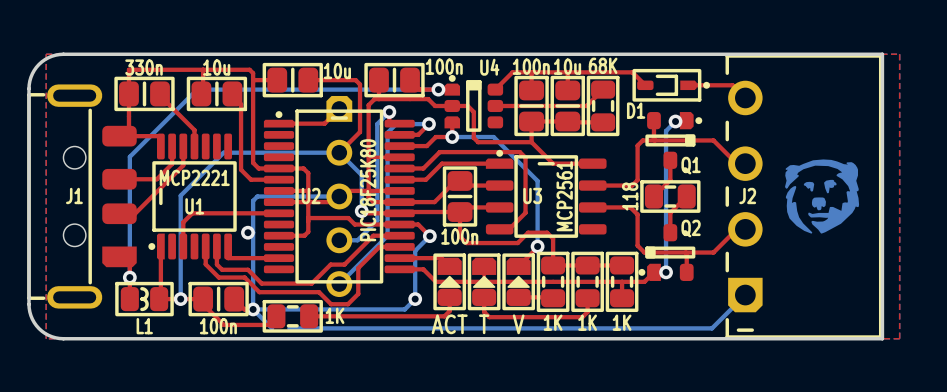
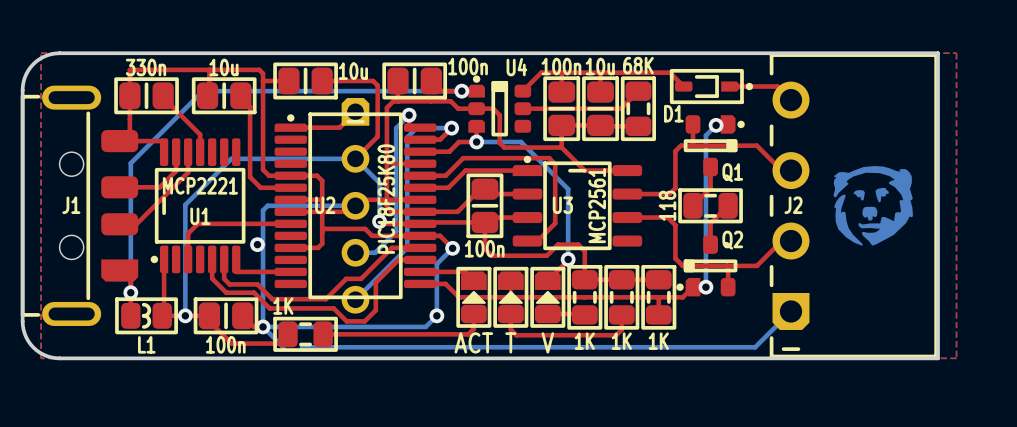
part value position: 1K (335, 315) -> 1K (283, 306)

